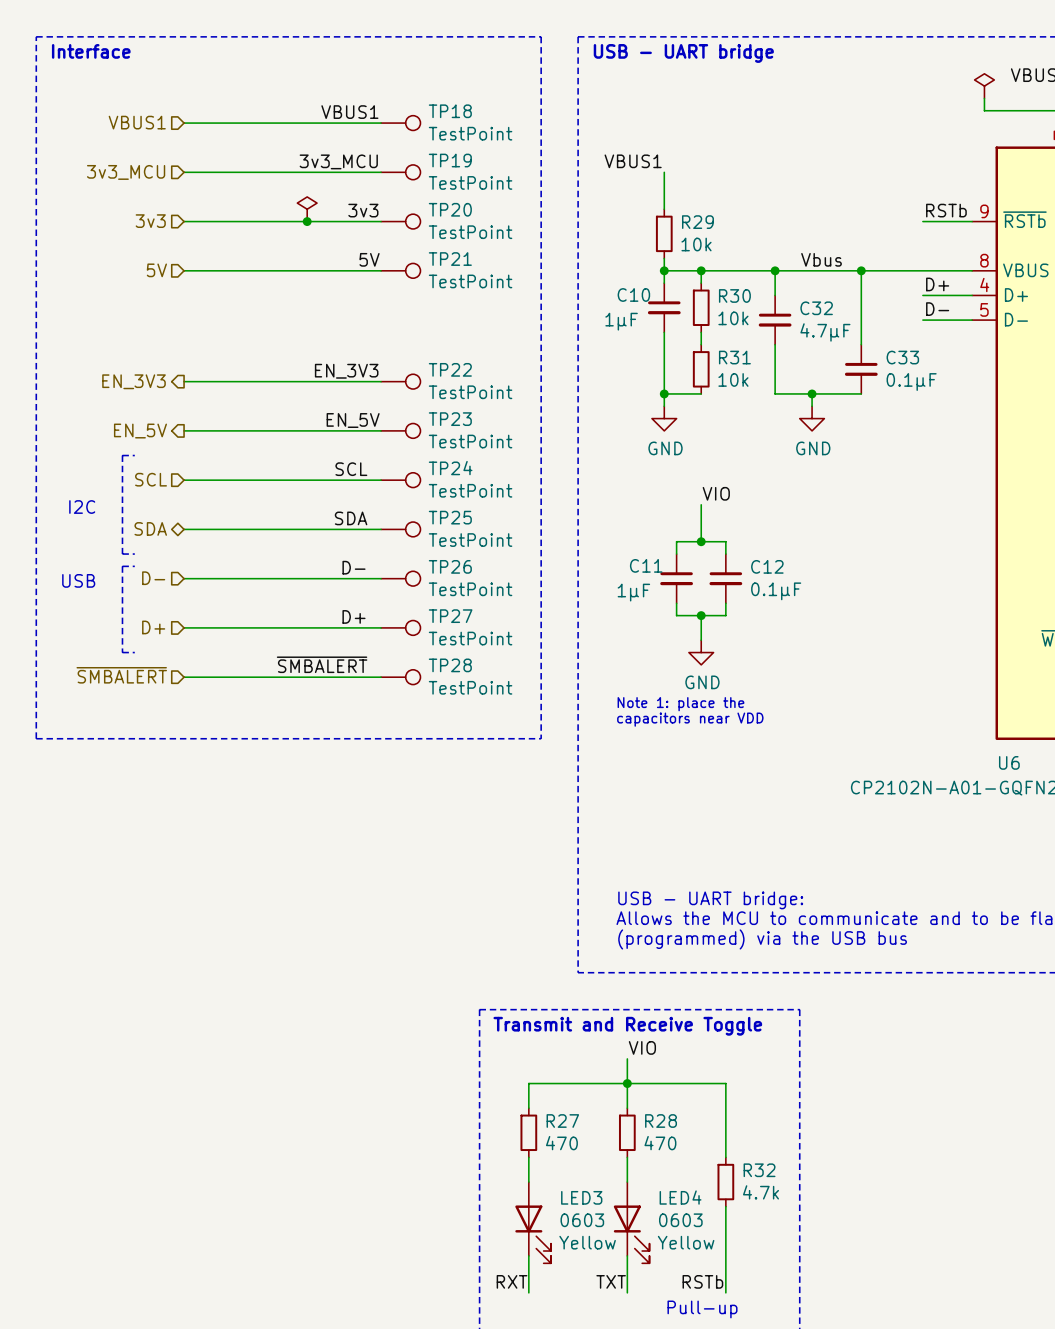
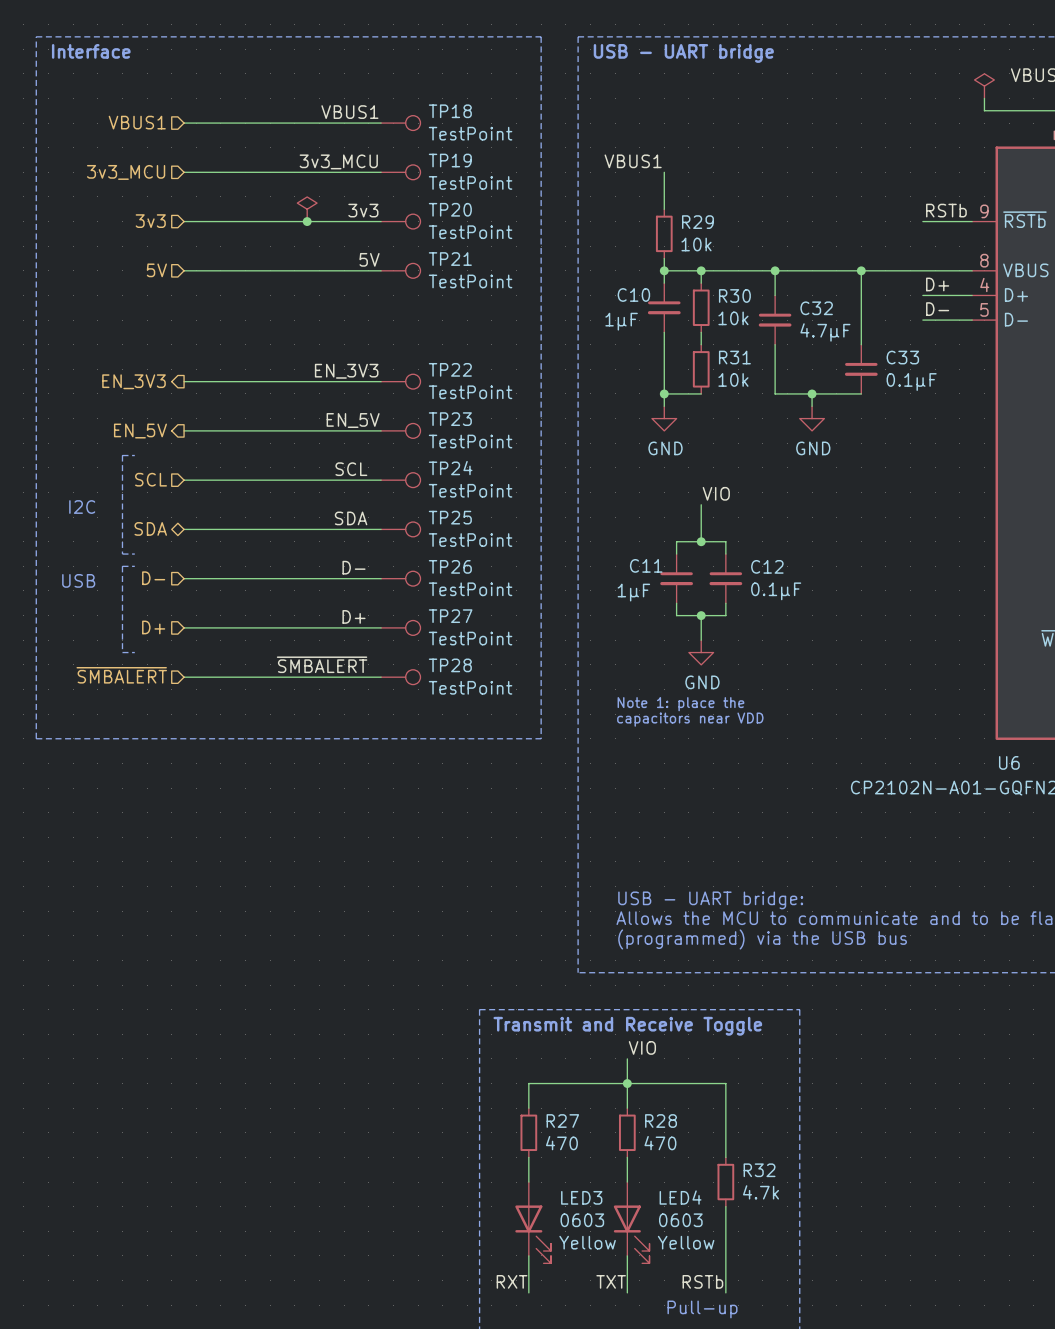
label: Vbus (821, 259) -> none

